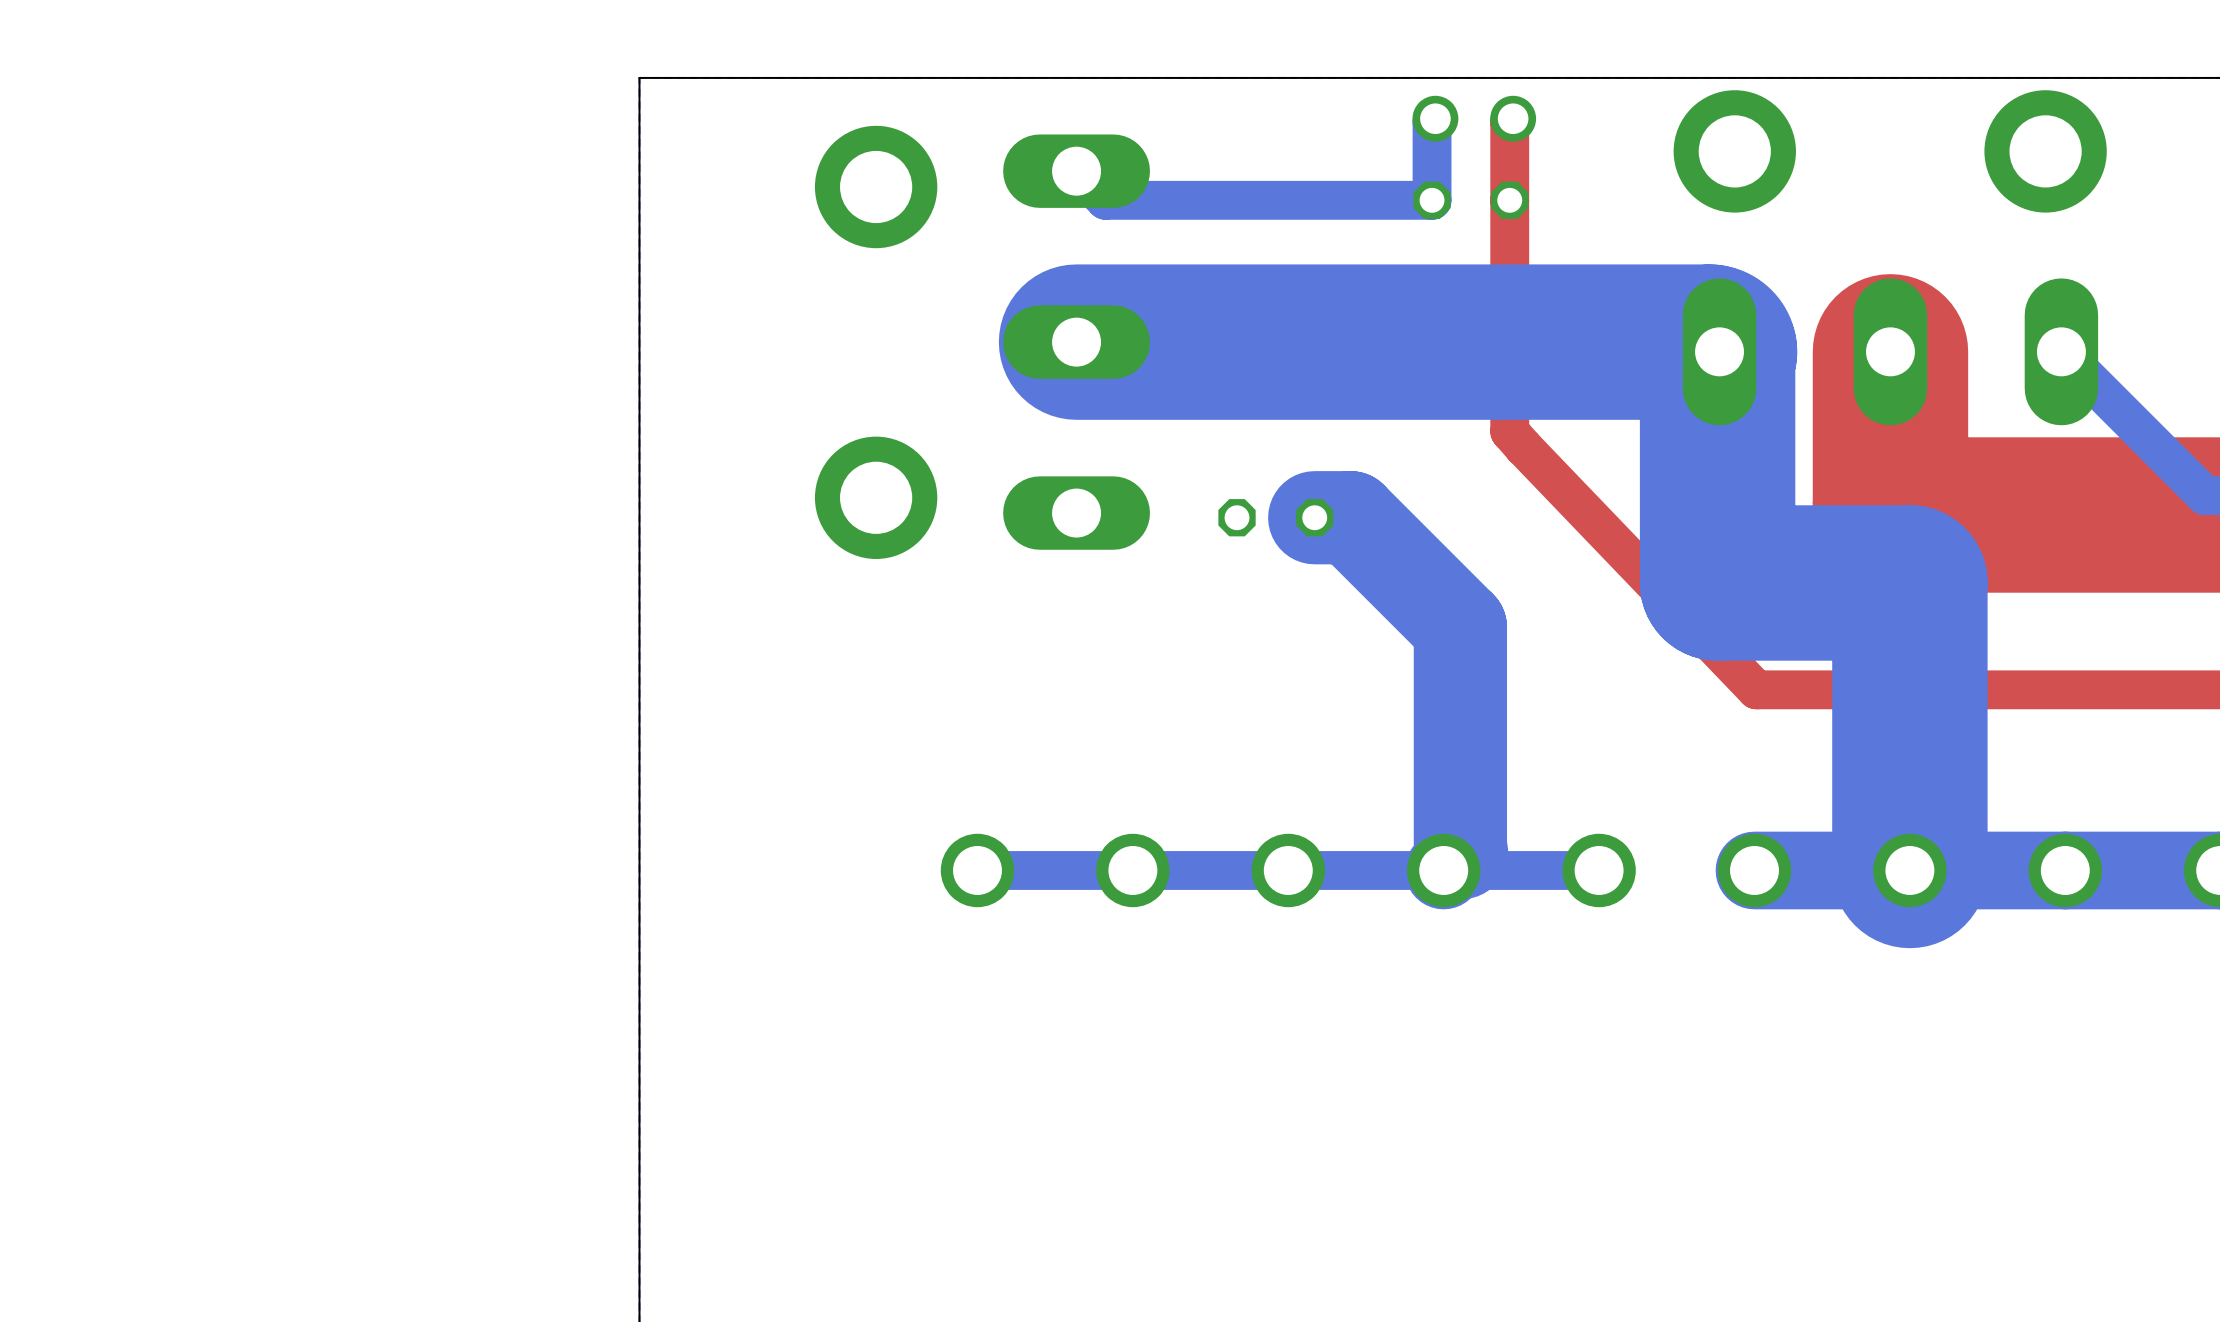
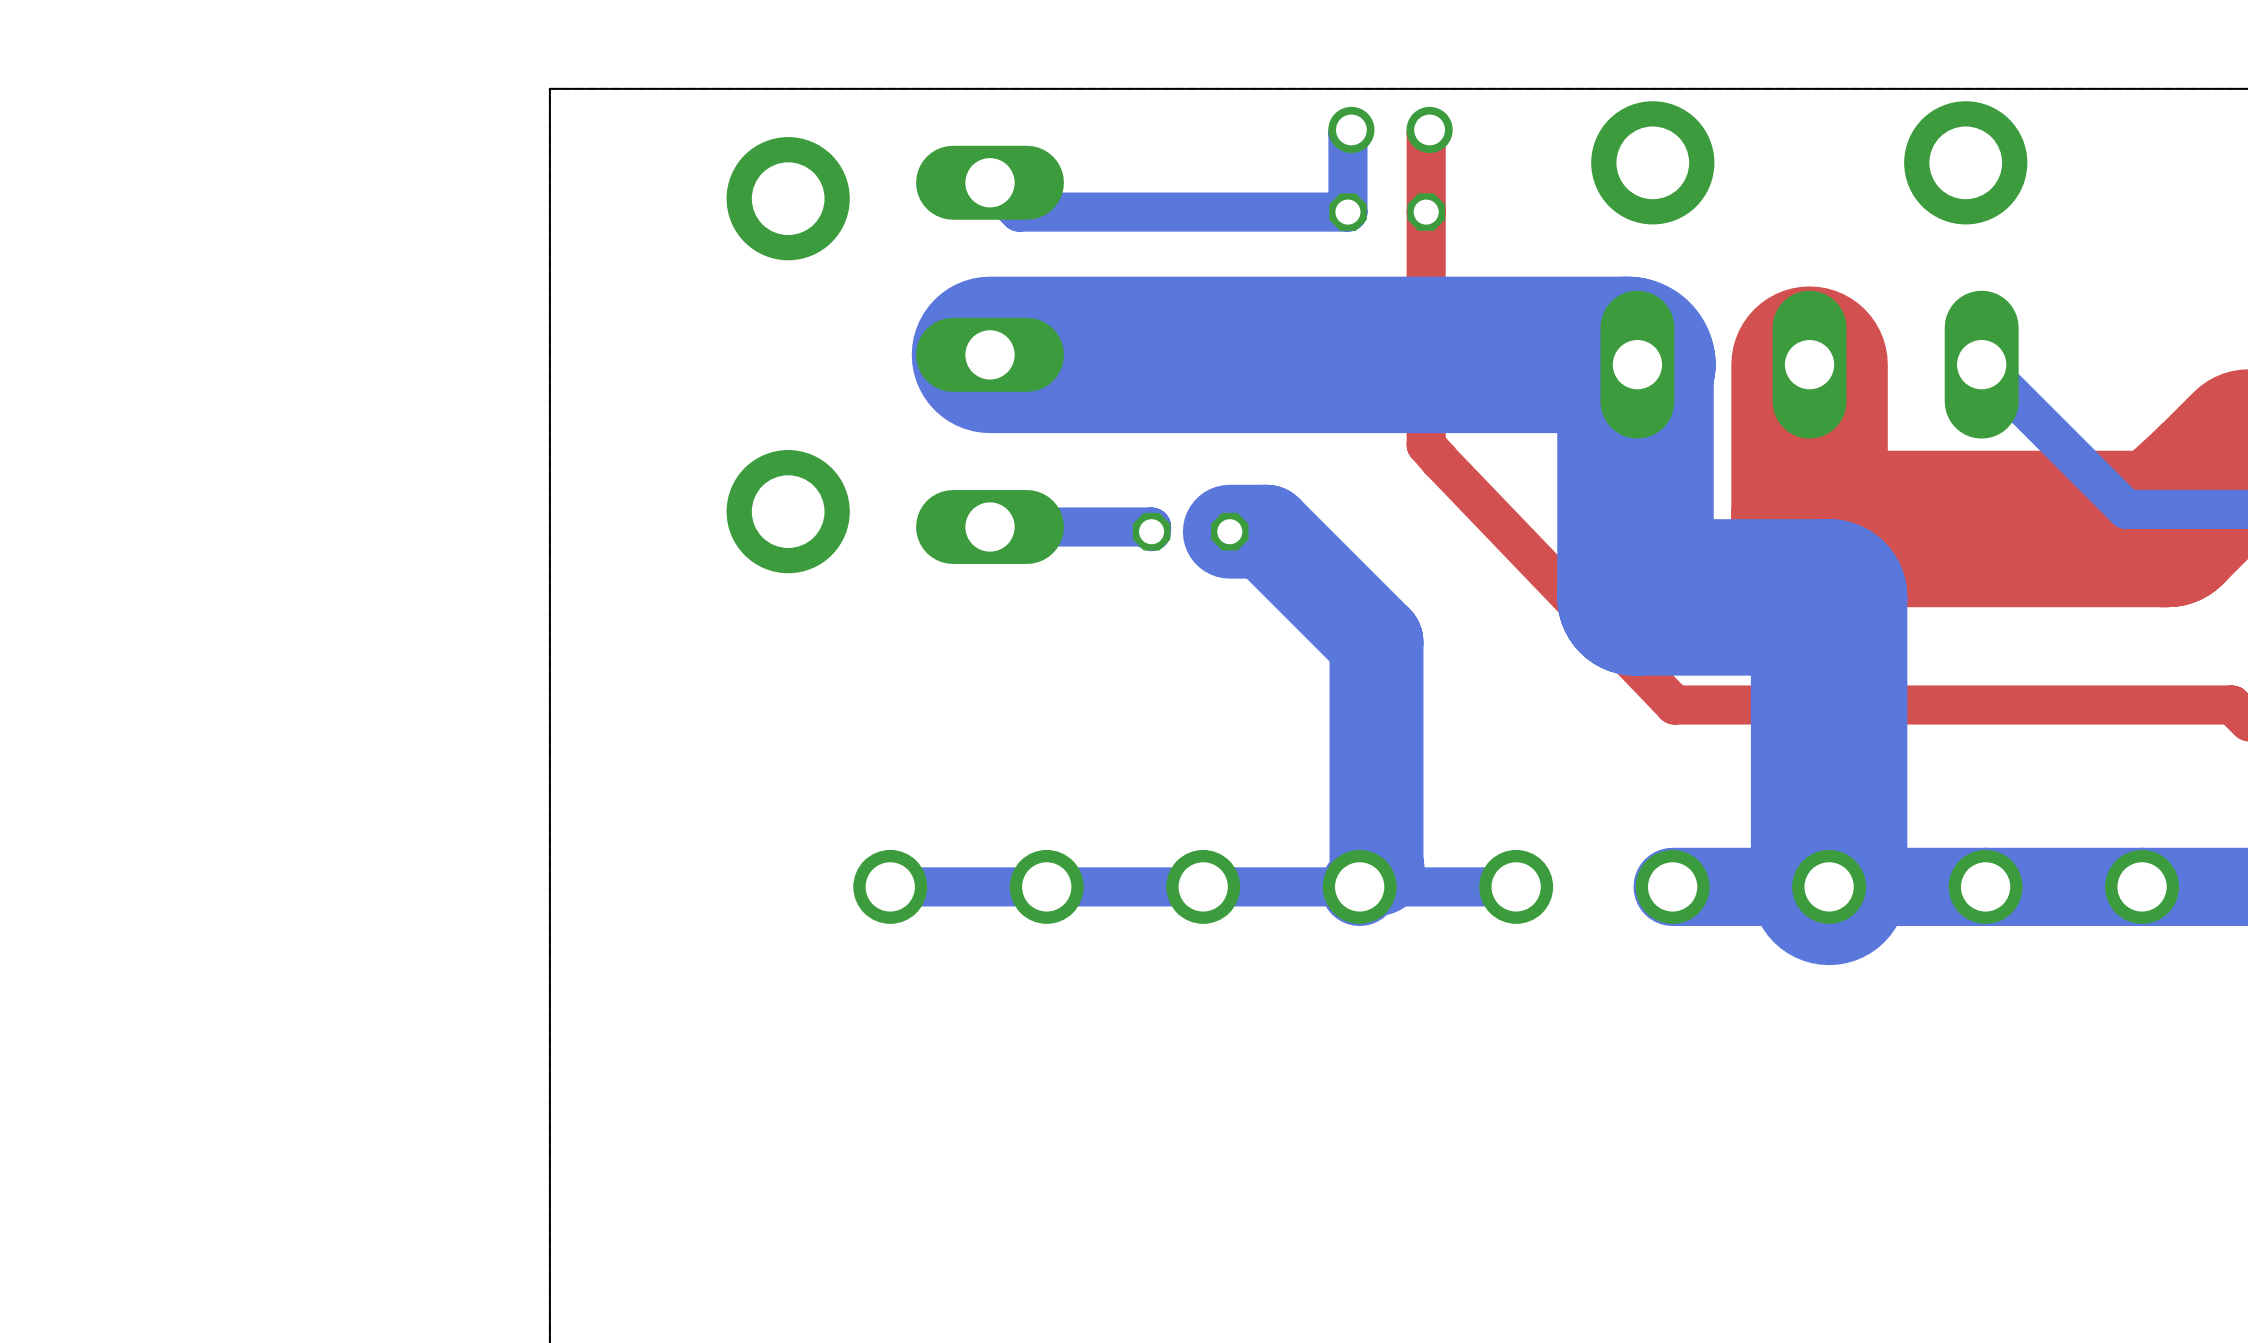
bottom track: none -> (990, 527) (1151, 527) (1151, 531)

